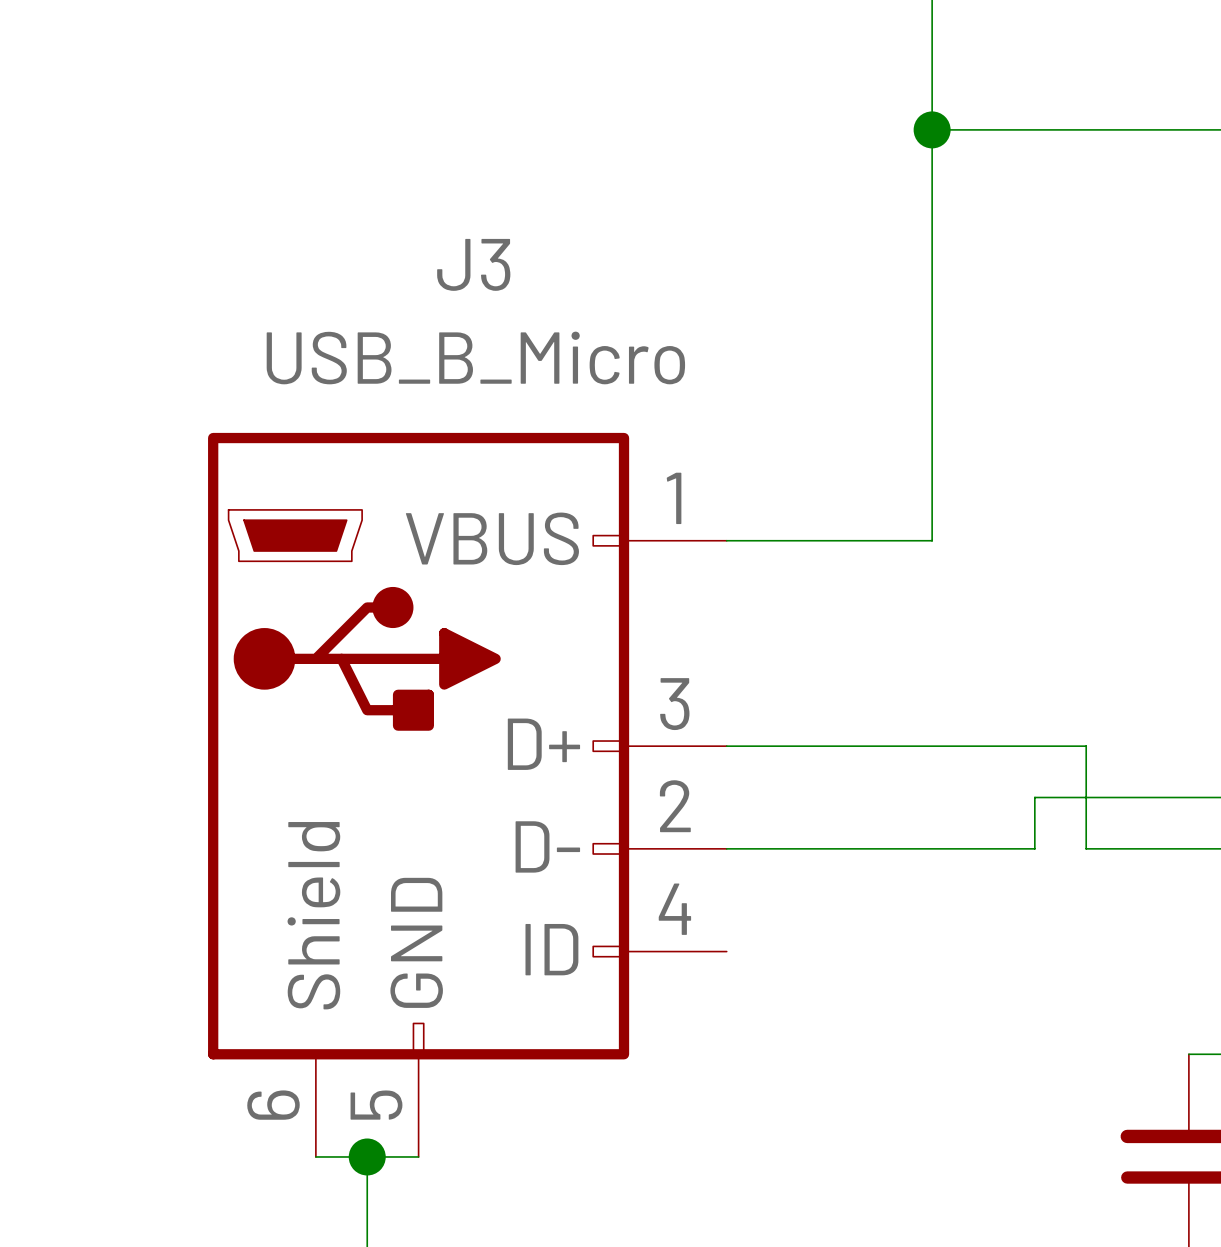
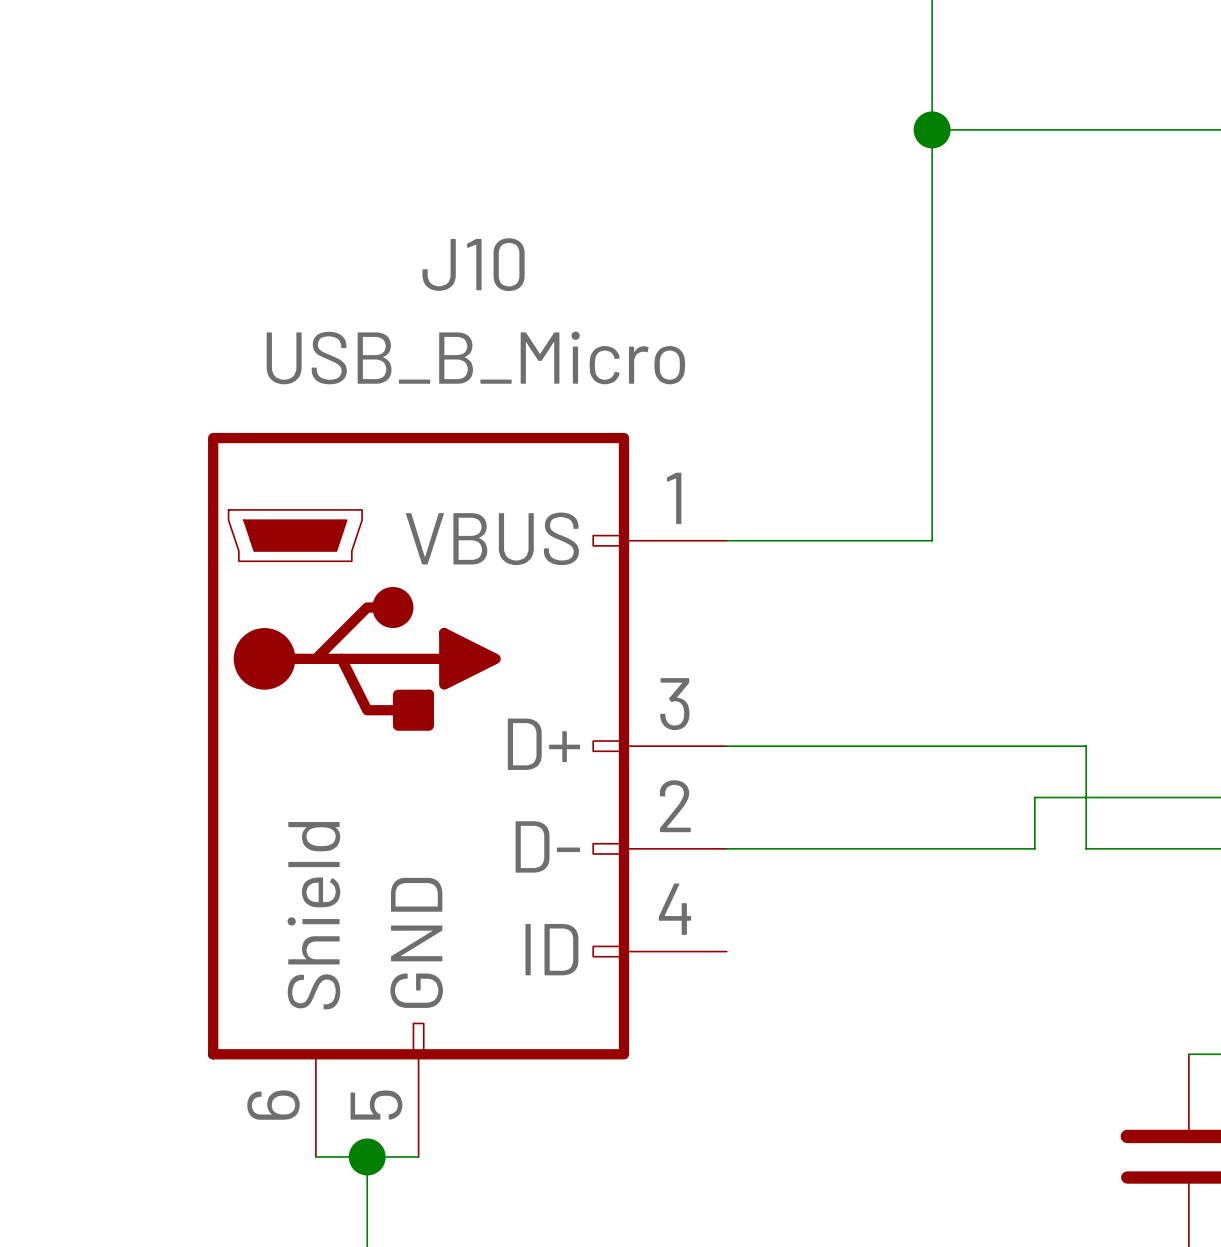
J3 name: J3 (473, 264) -> J10 (473, 264)

